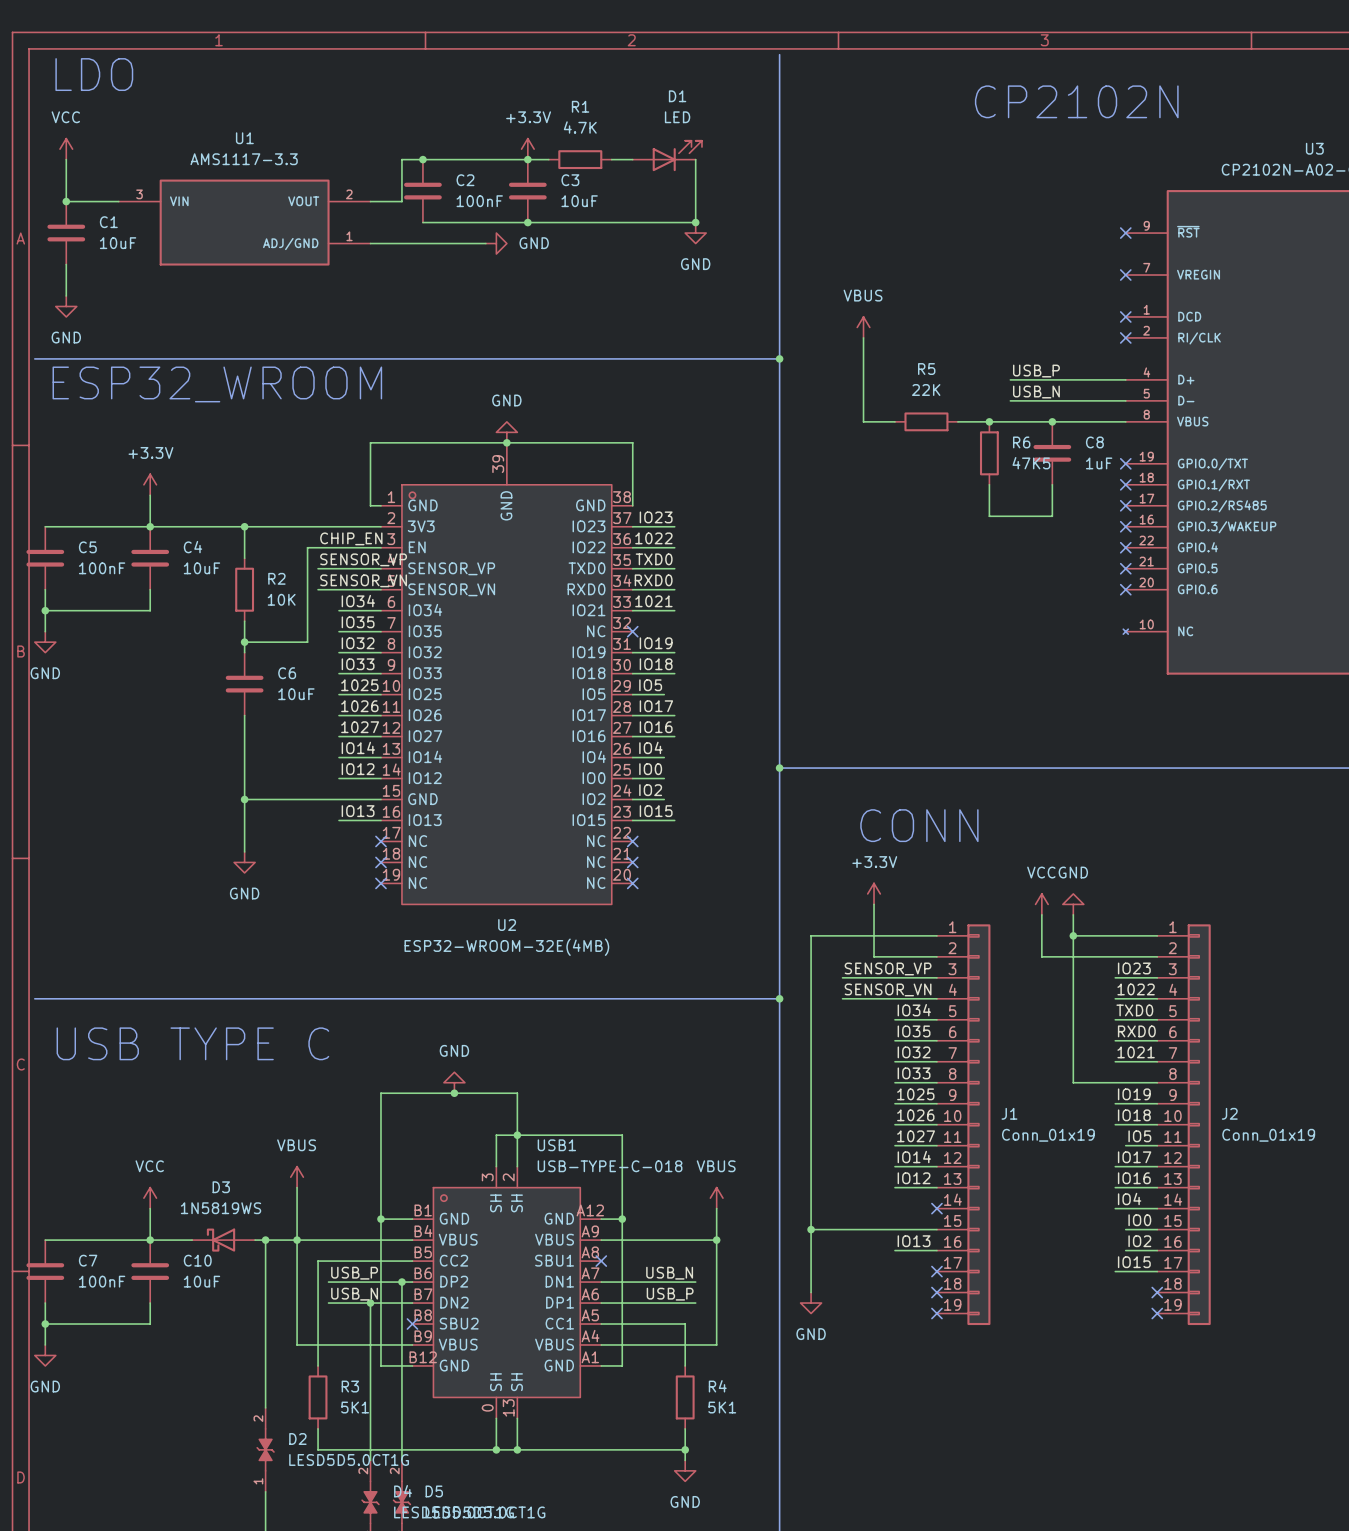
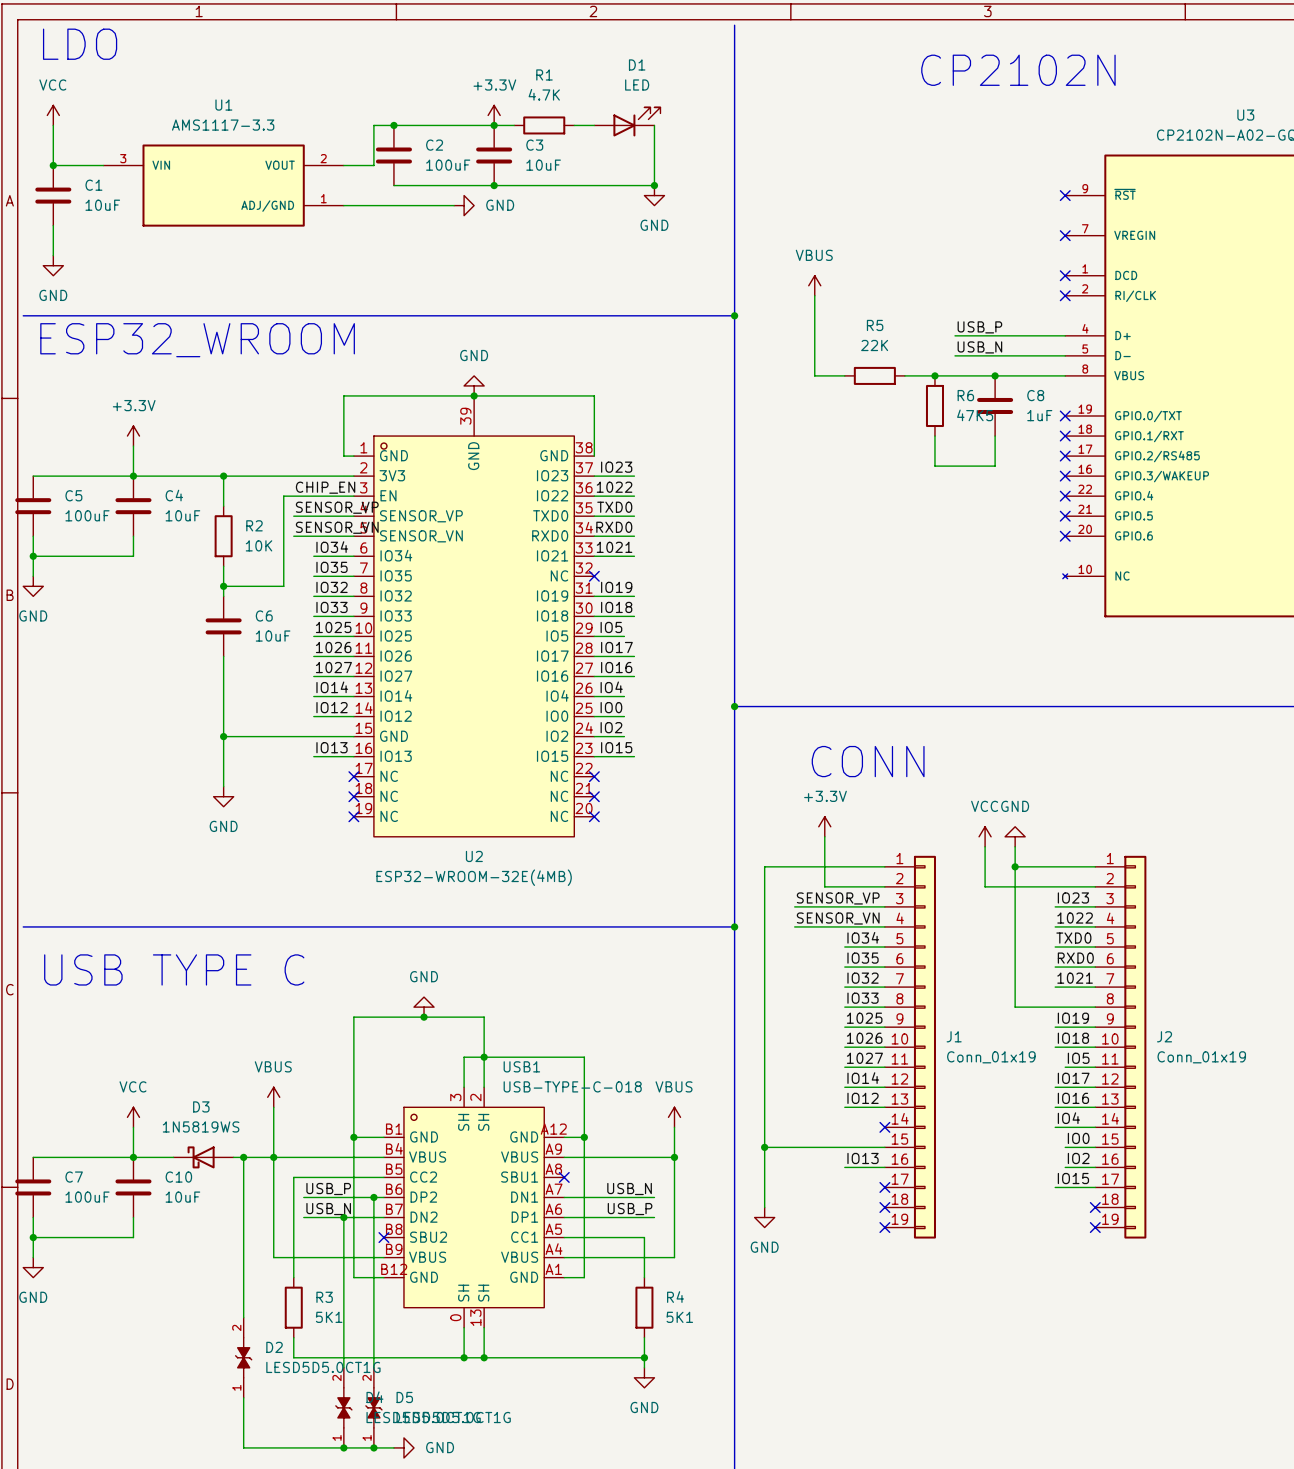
C2 value: 100nF (479, 201) -> 100uF (448, 165)
C5 value: 100nF (102, 568) -> 100uF (87, 515)
C7 value: 100nF (102, 1281) -> 100uF (87, 1197)

